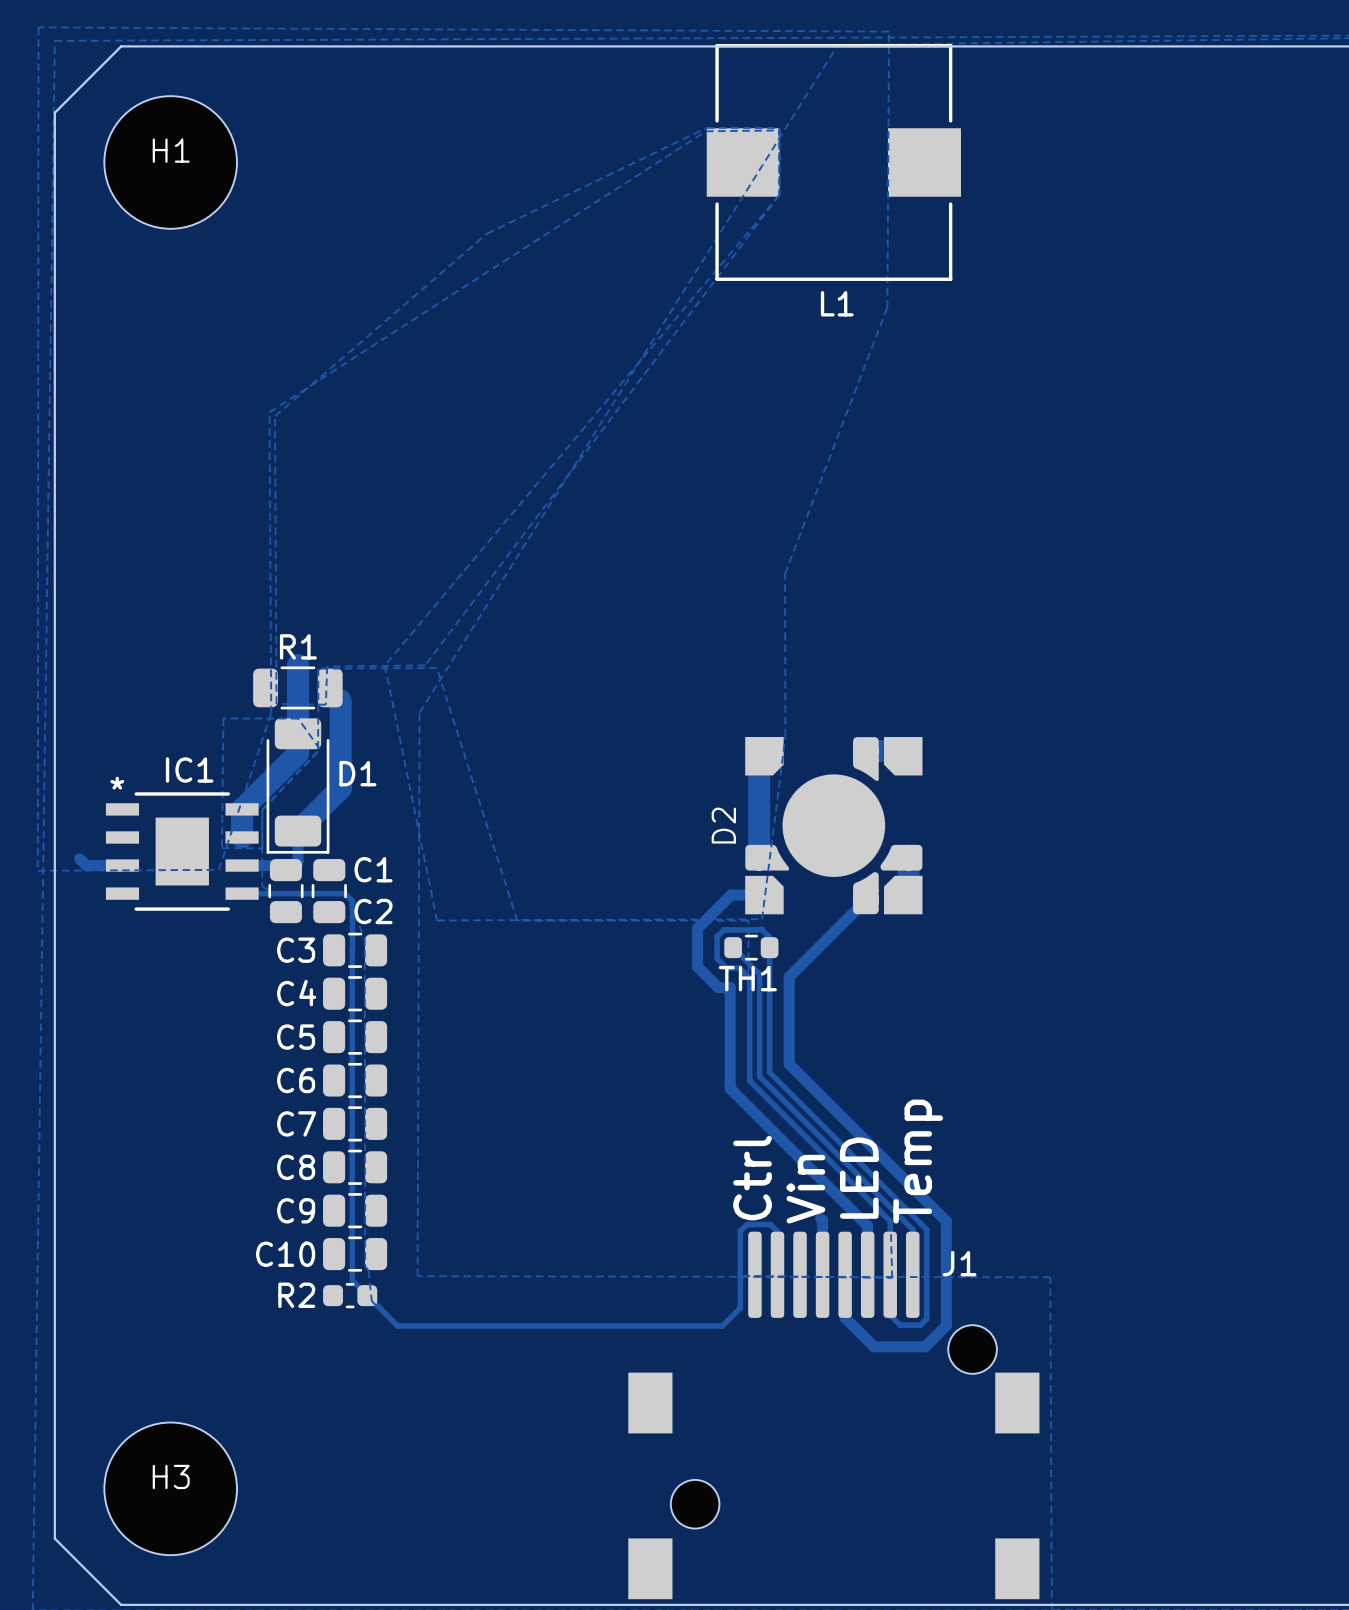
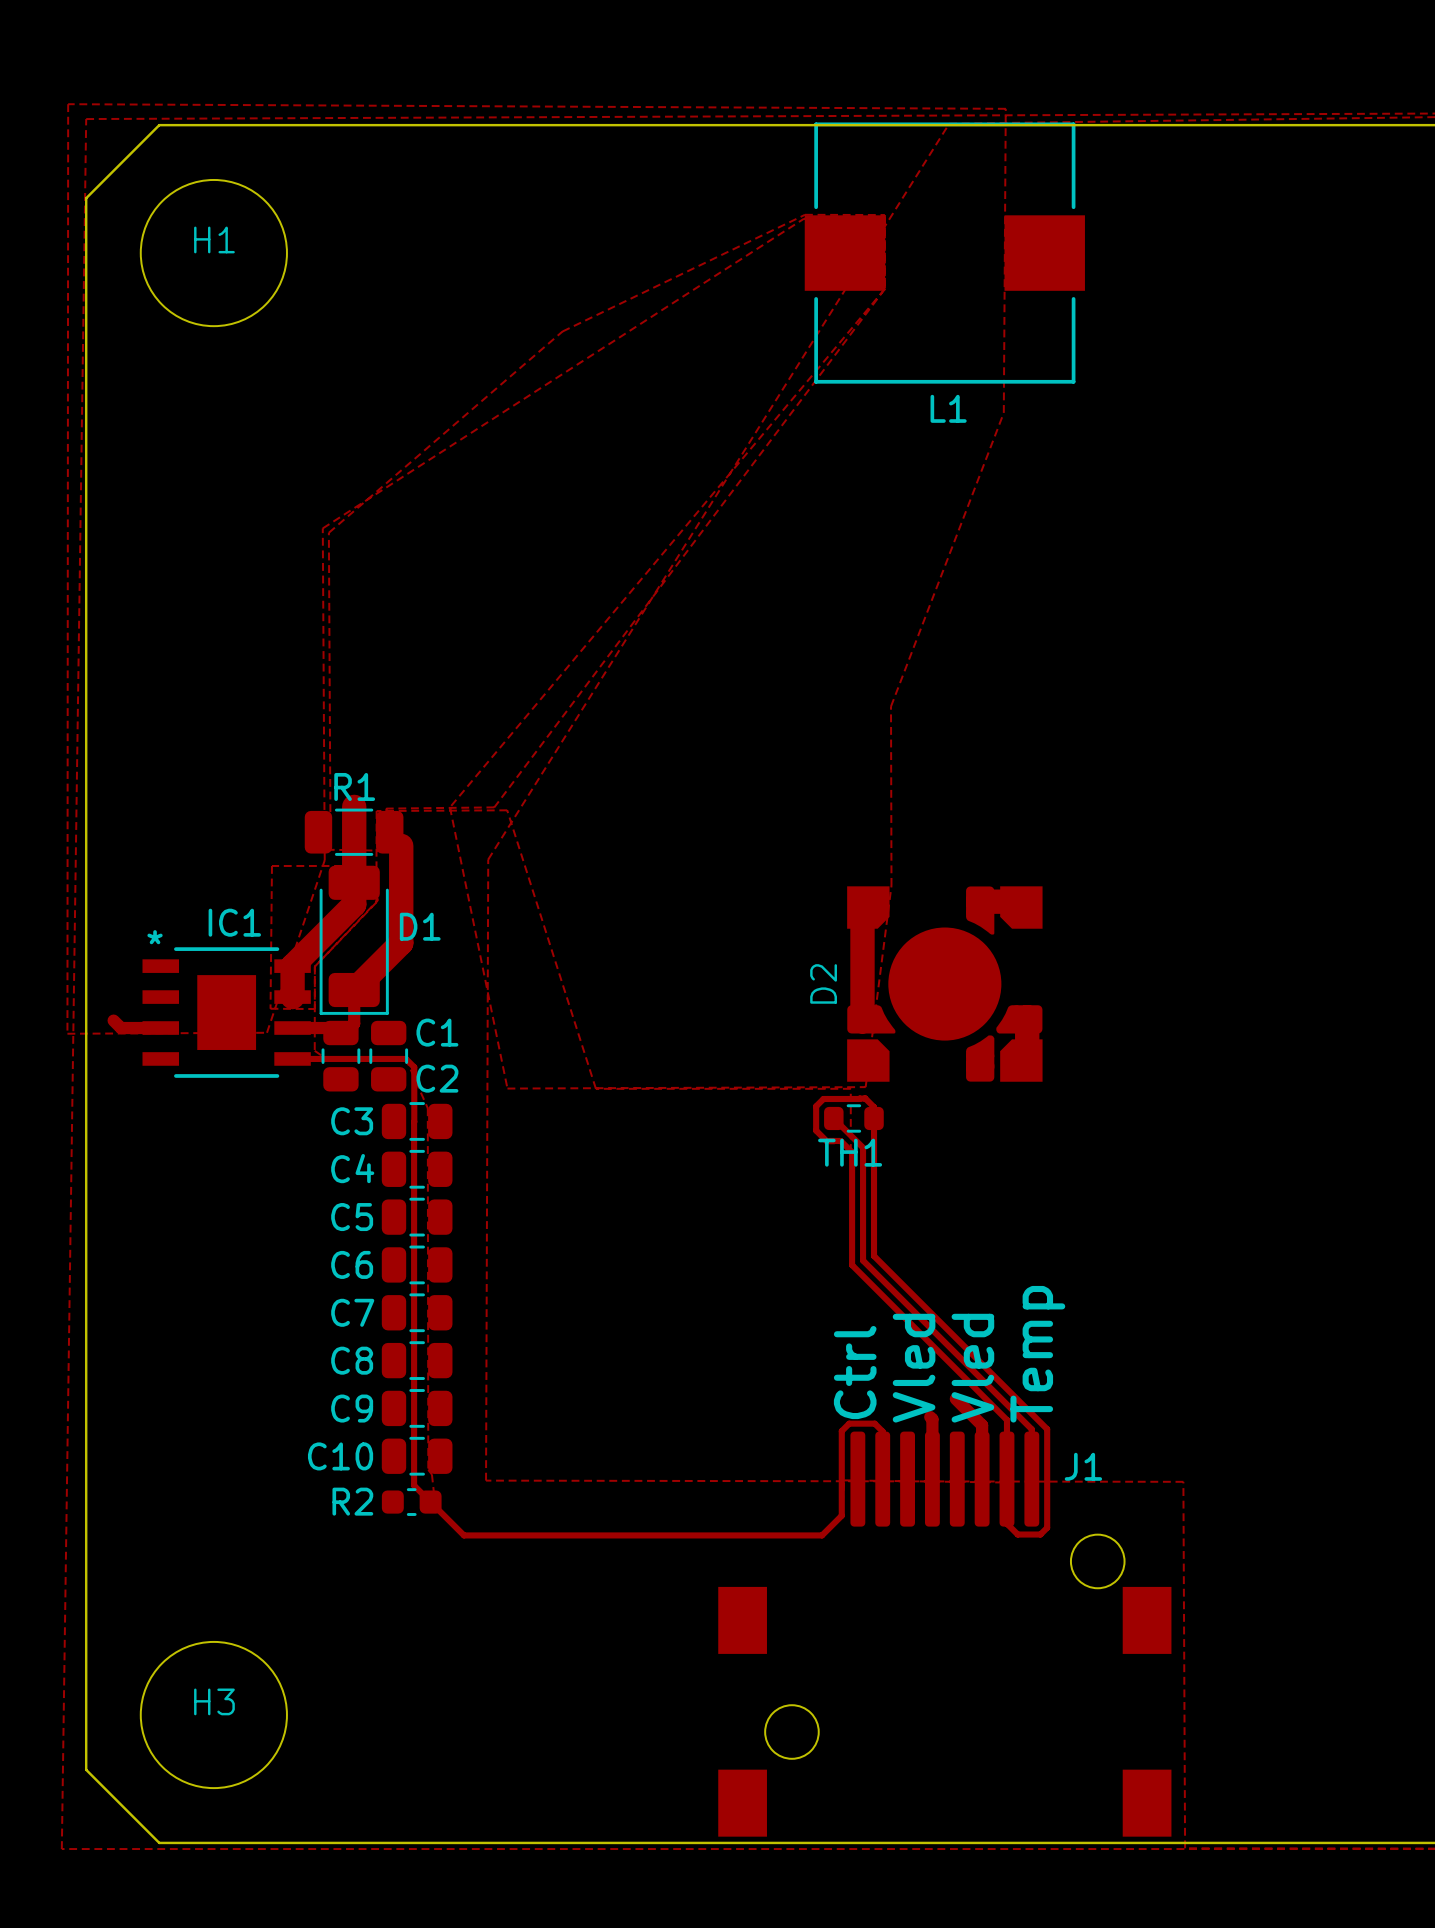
track: (764, 895) (731, 895) (697, 928) (697, 966) (718, 987) (730, 987) (730, 1088) (843, 1202) -> none
track: (865, 900) (789, 977) (789, 1064) (946, 1221) (946, 1325) (925, 1346) (874, 1346) (845, 1317) (845, 1274) -> none
text: LED (859, 1178) -> Vled (972, 1368)
text: Vin (805, 1189) -> Vled (914, 1368)

